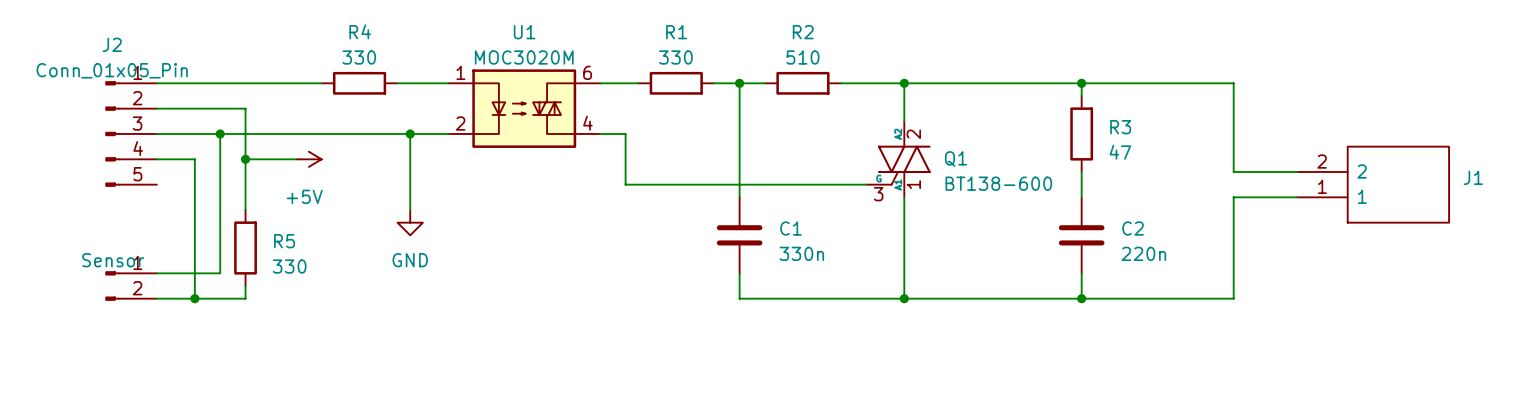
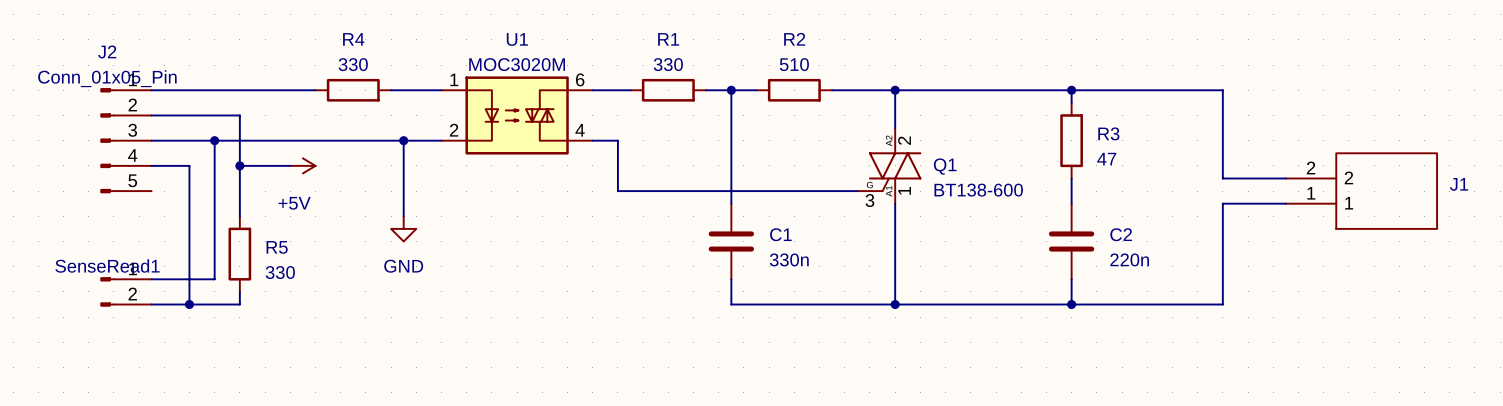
Sensor name: Sensor (113, 260) -> SenseRead1 (107, 265)

